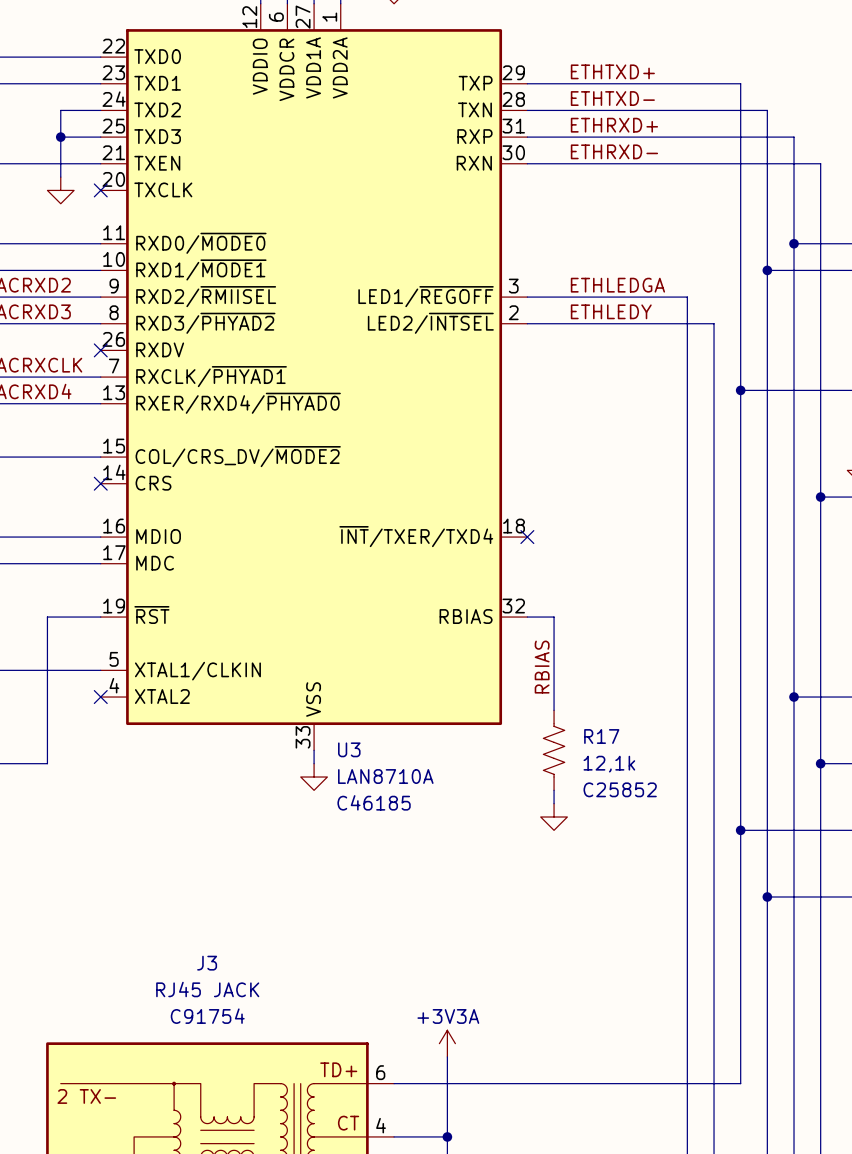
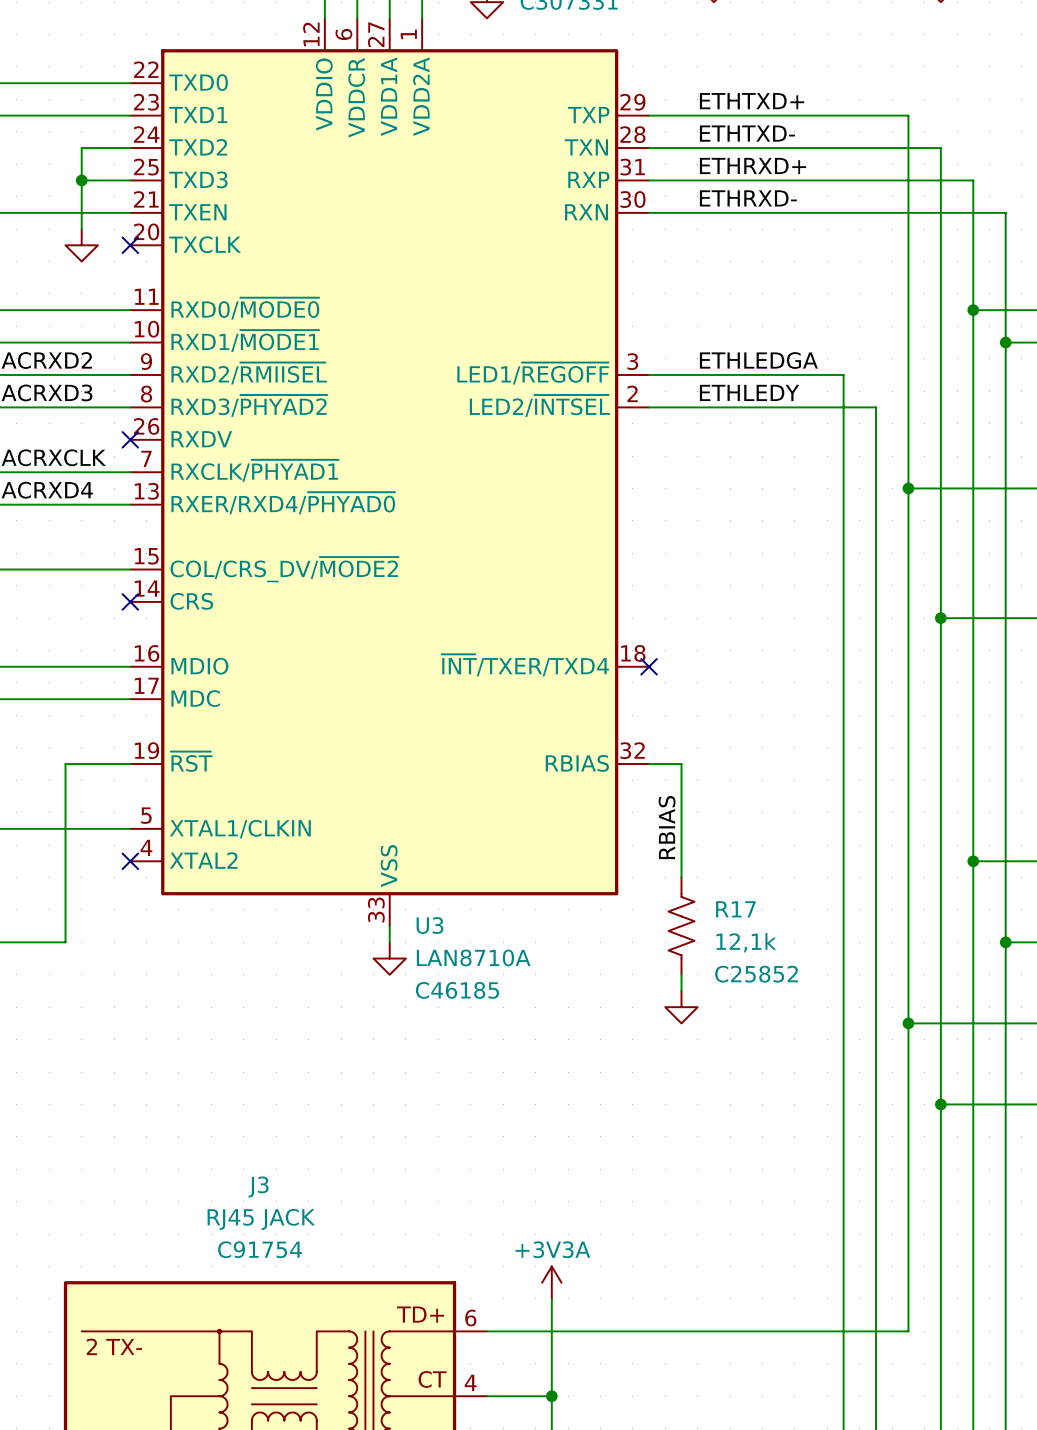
wire: (767, 270) (820, 270) -> (940, 618) (1005, 618)
junction position: (767, 270) -> (1005, 342)
junction position: (820, 497) -> (940, 618)

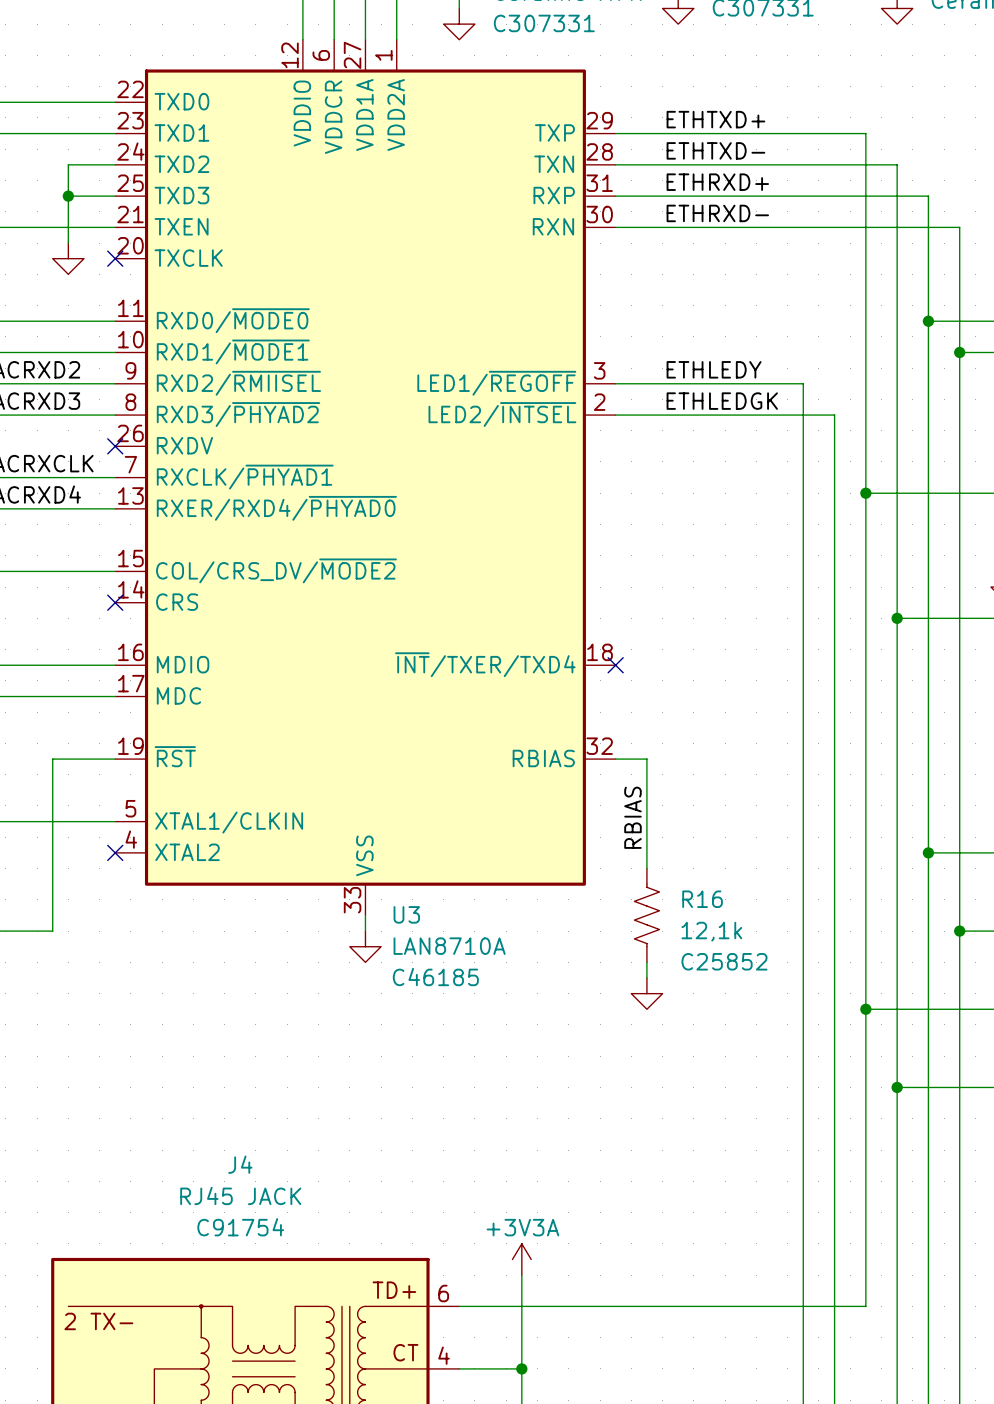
label: ETHLEDGA (758, 360) -> ETHLEDY (714, 369)
label: ETHLEDY (749, 392) -> ETHLEDGK (722, 401)
R17 name: R17 (735, 909) -> R16 (702, 899)
J3 name: J3 (258, 1186) -> J4 (240, 1164)

